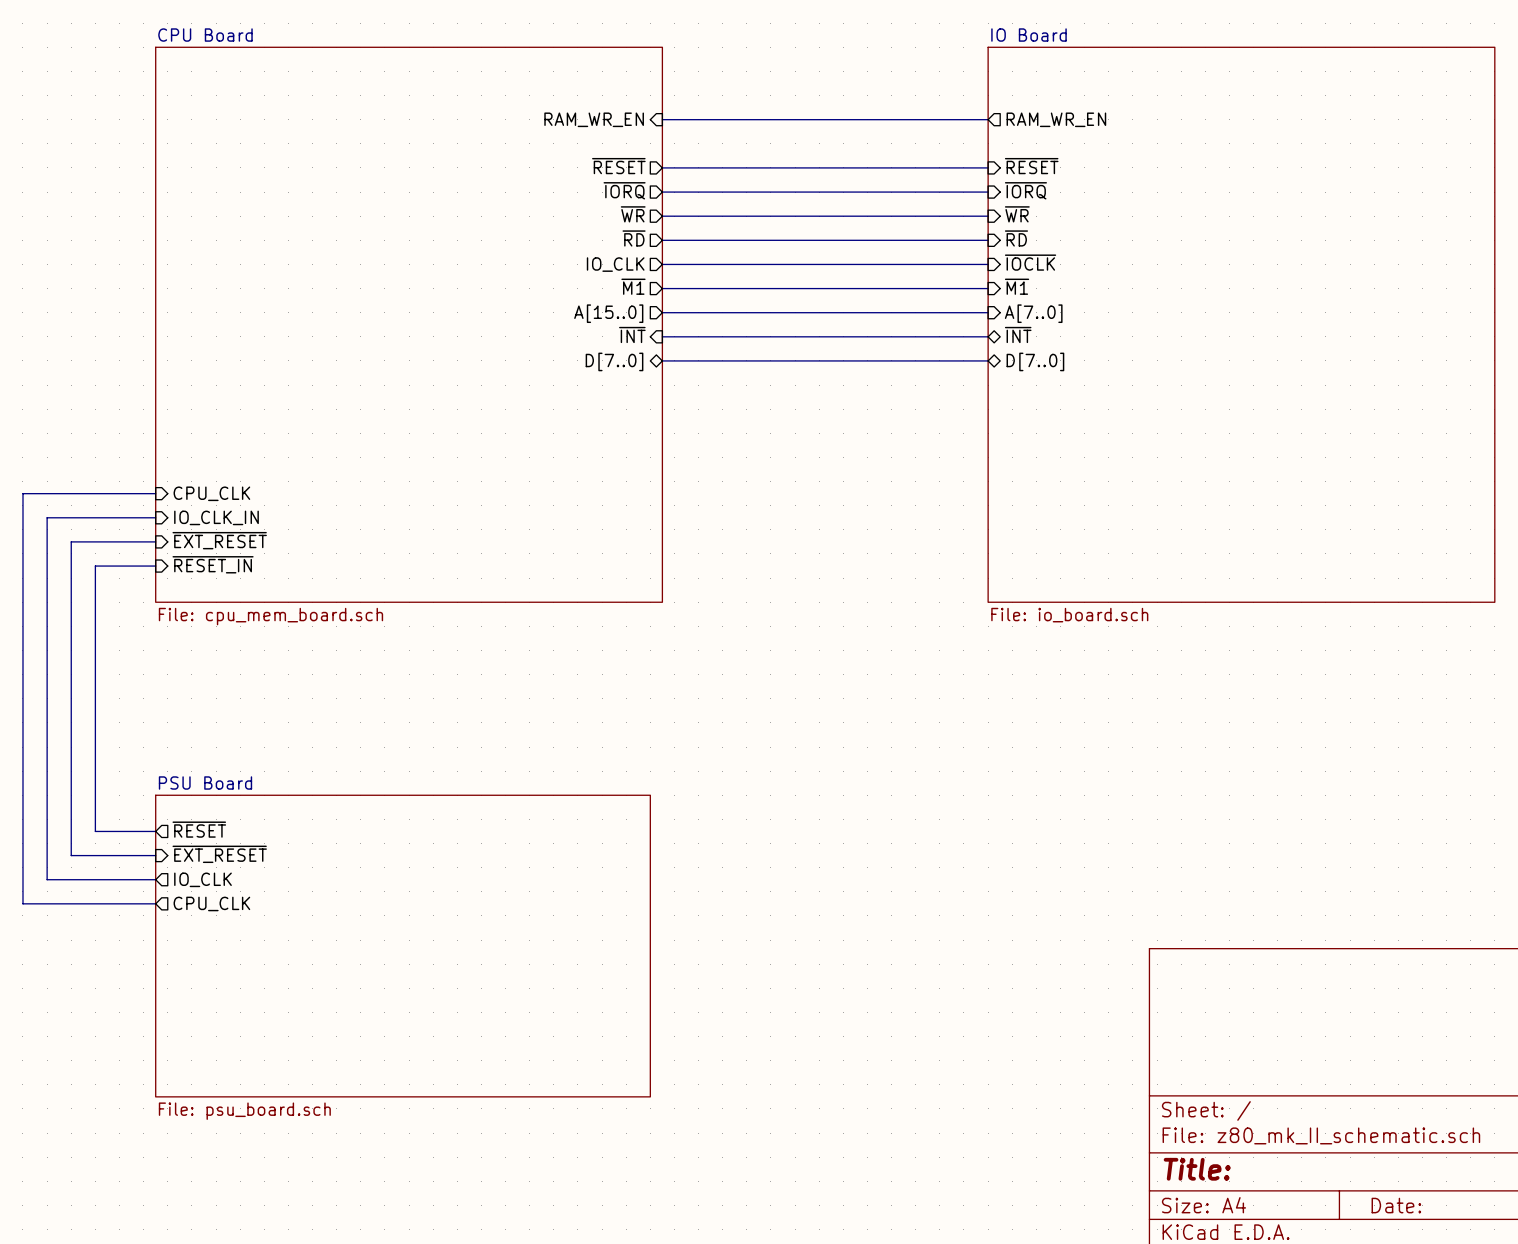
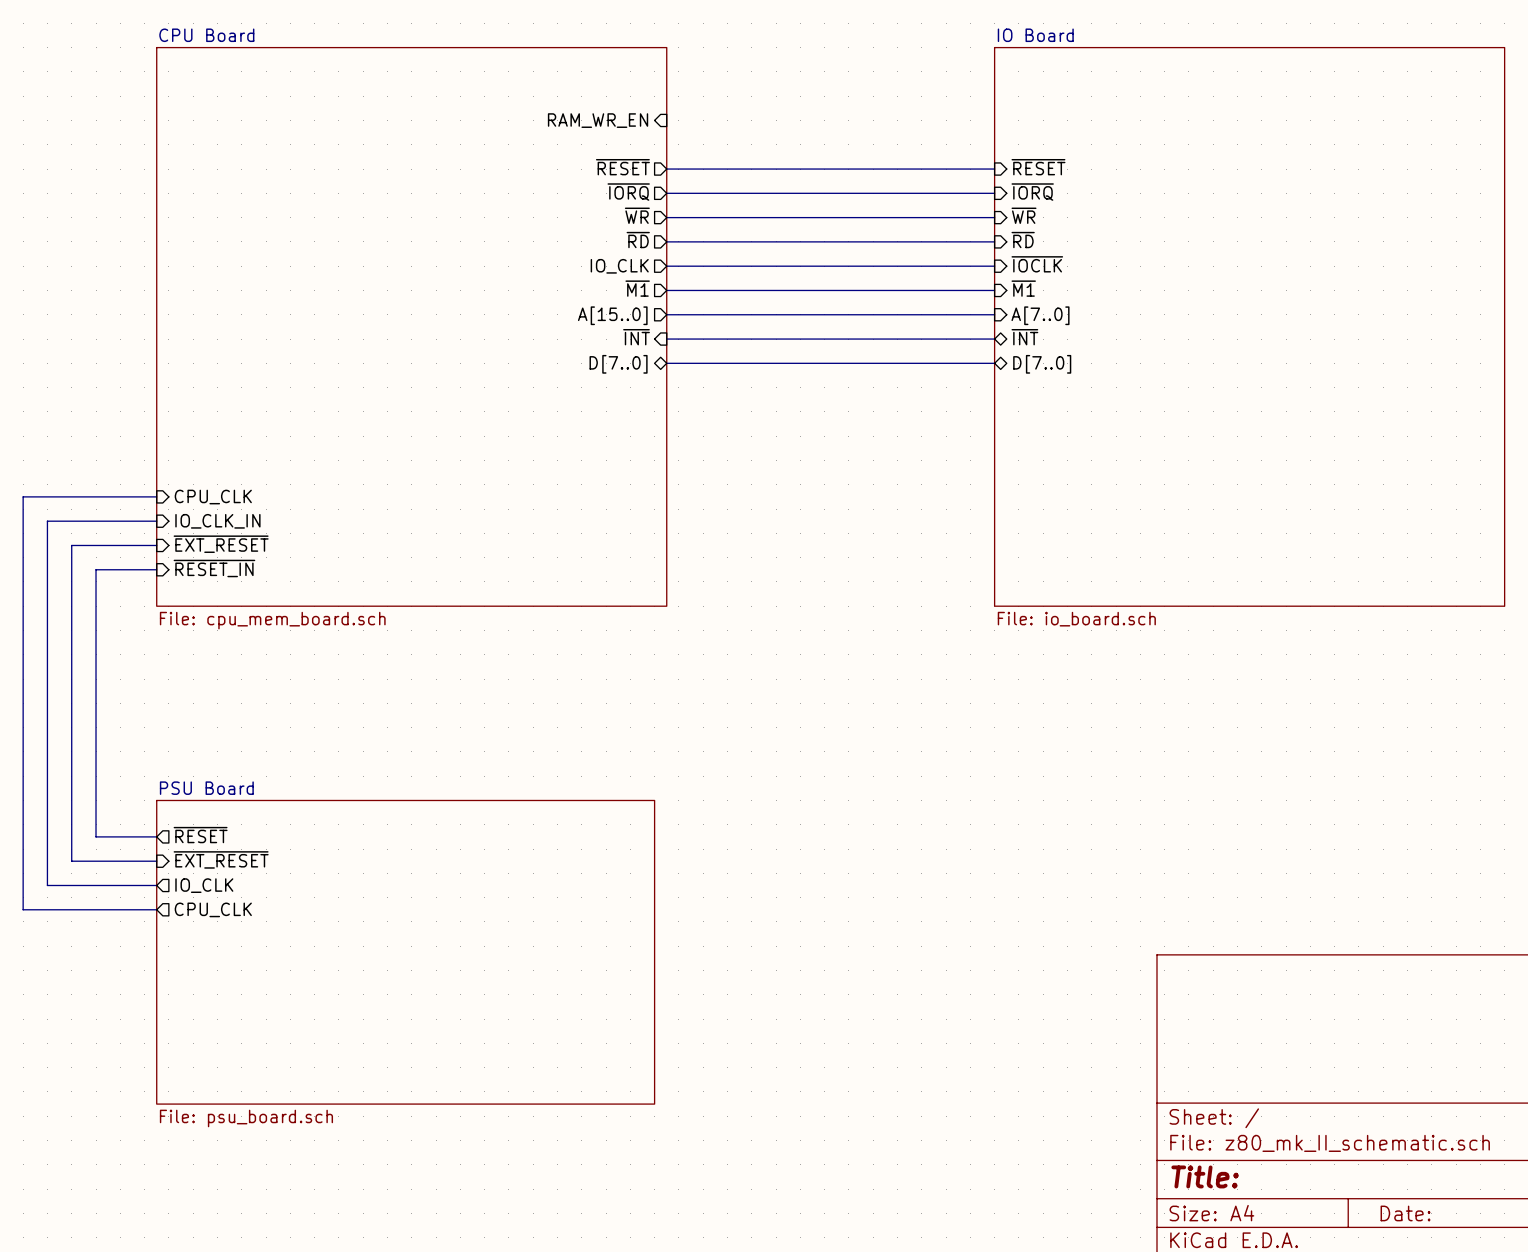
wire: (662, 119) (988, 119) -> none
sheet pin: RAM_WR_EN (1056, 119) -> none

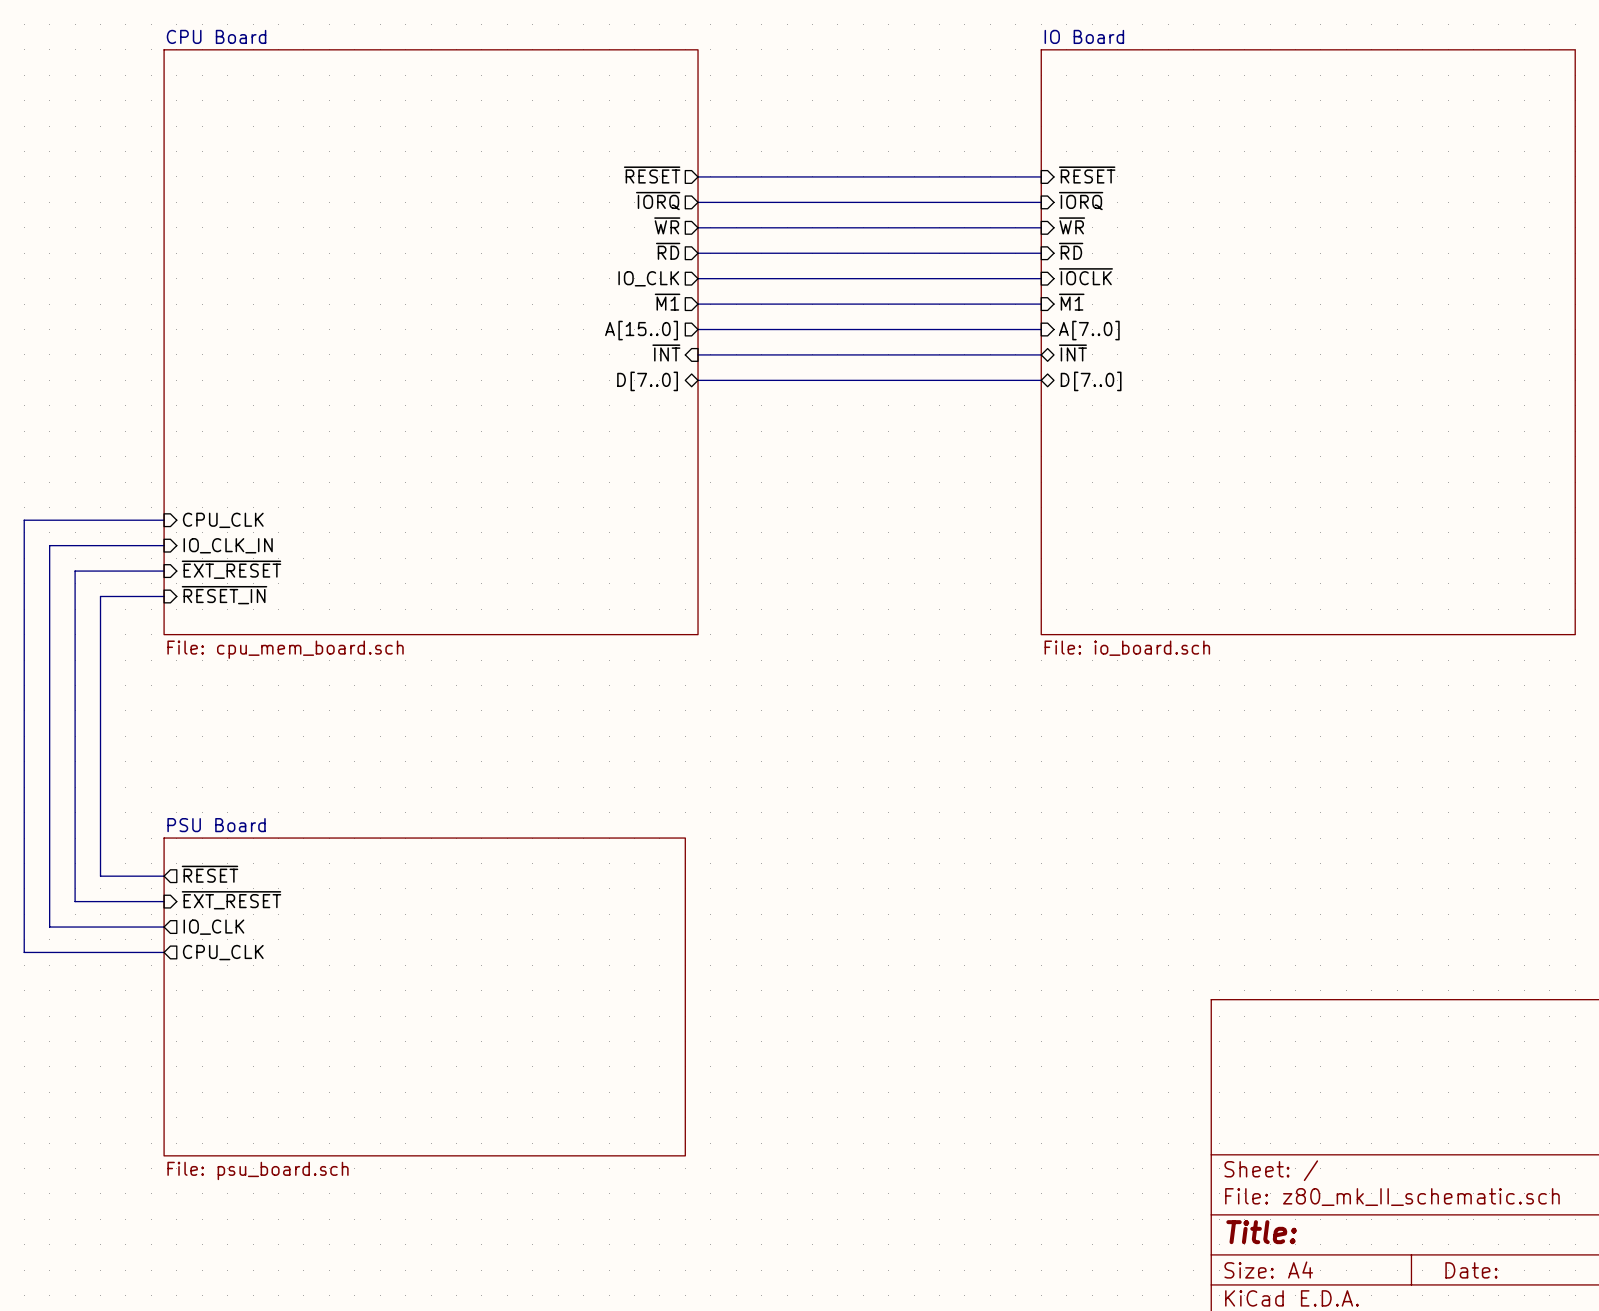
sheet pin: RAM_WR_EN (598, 120) -> none

